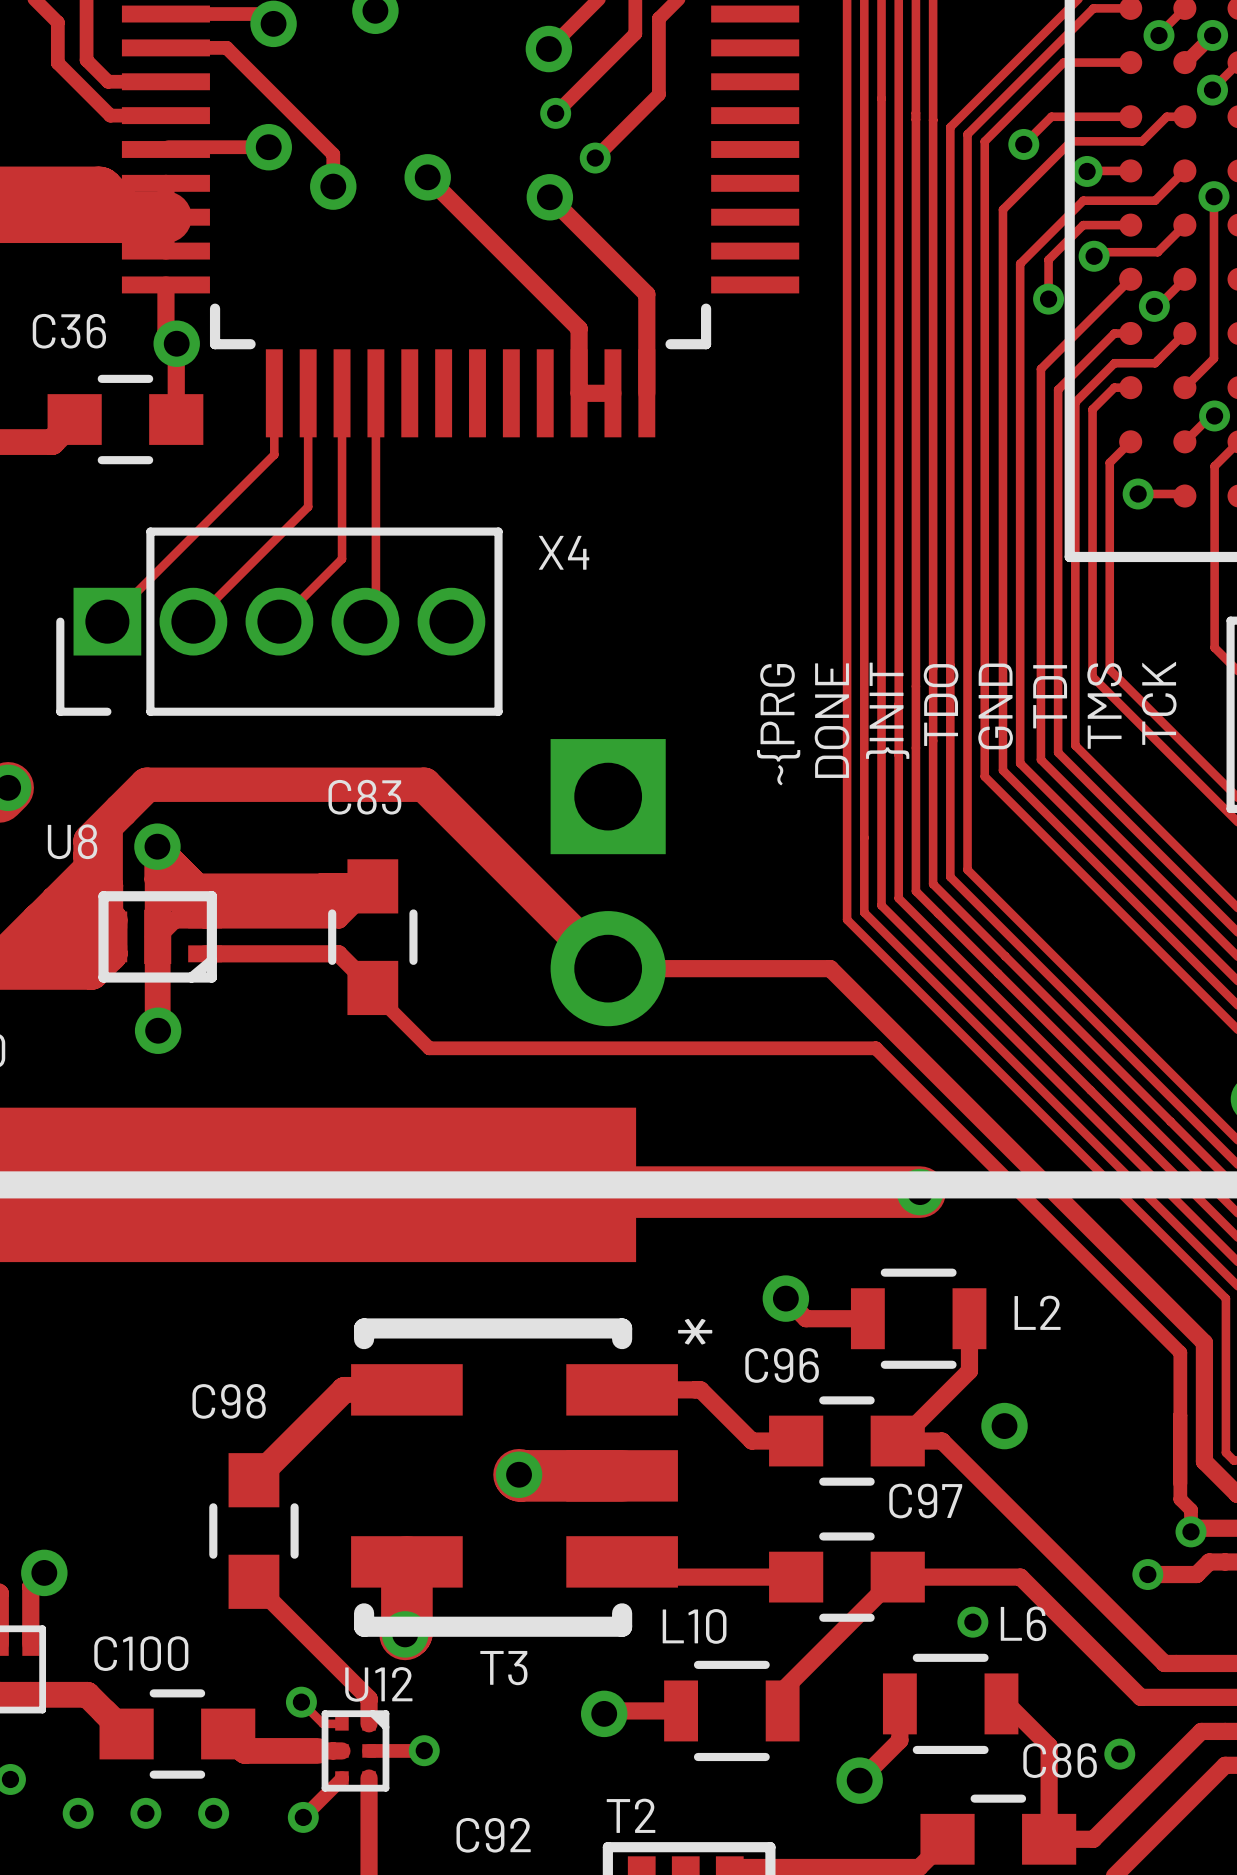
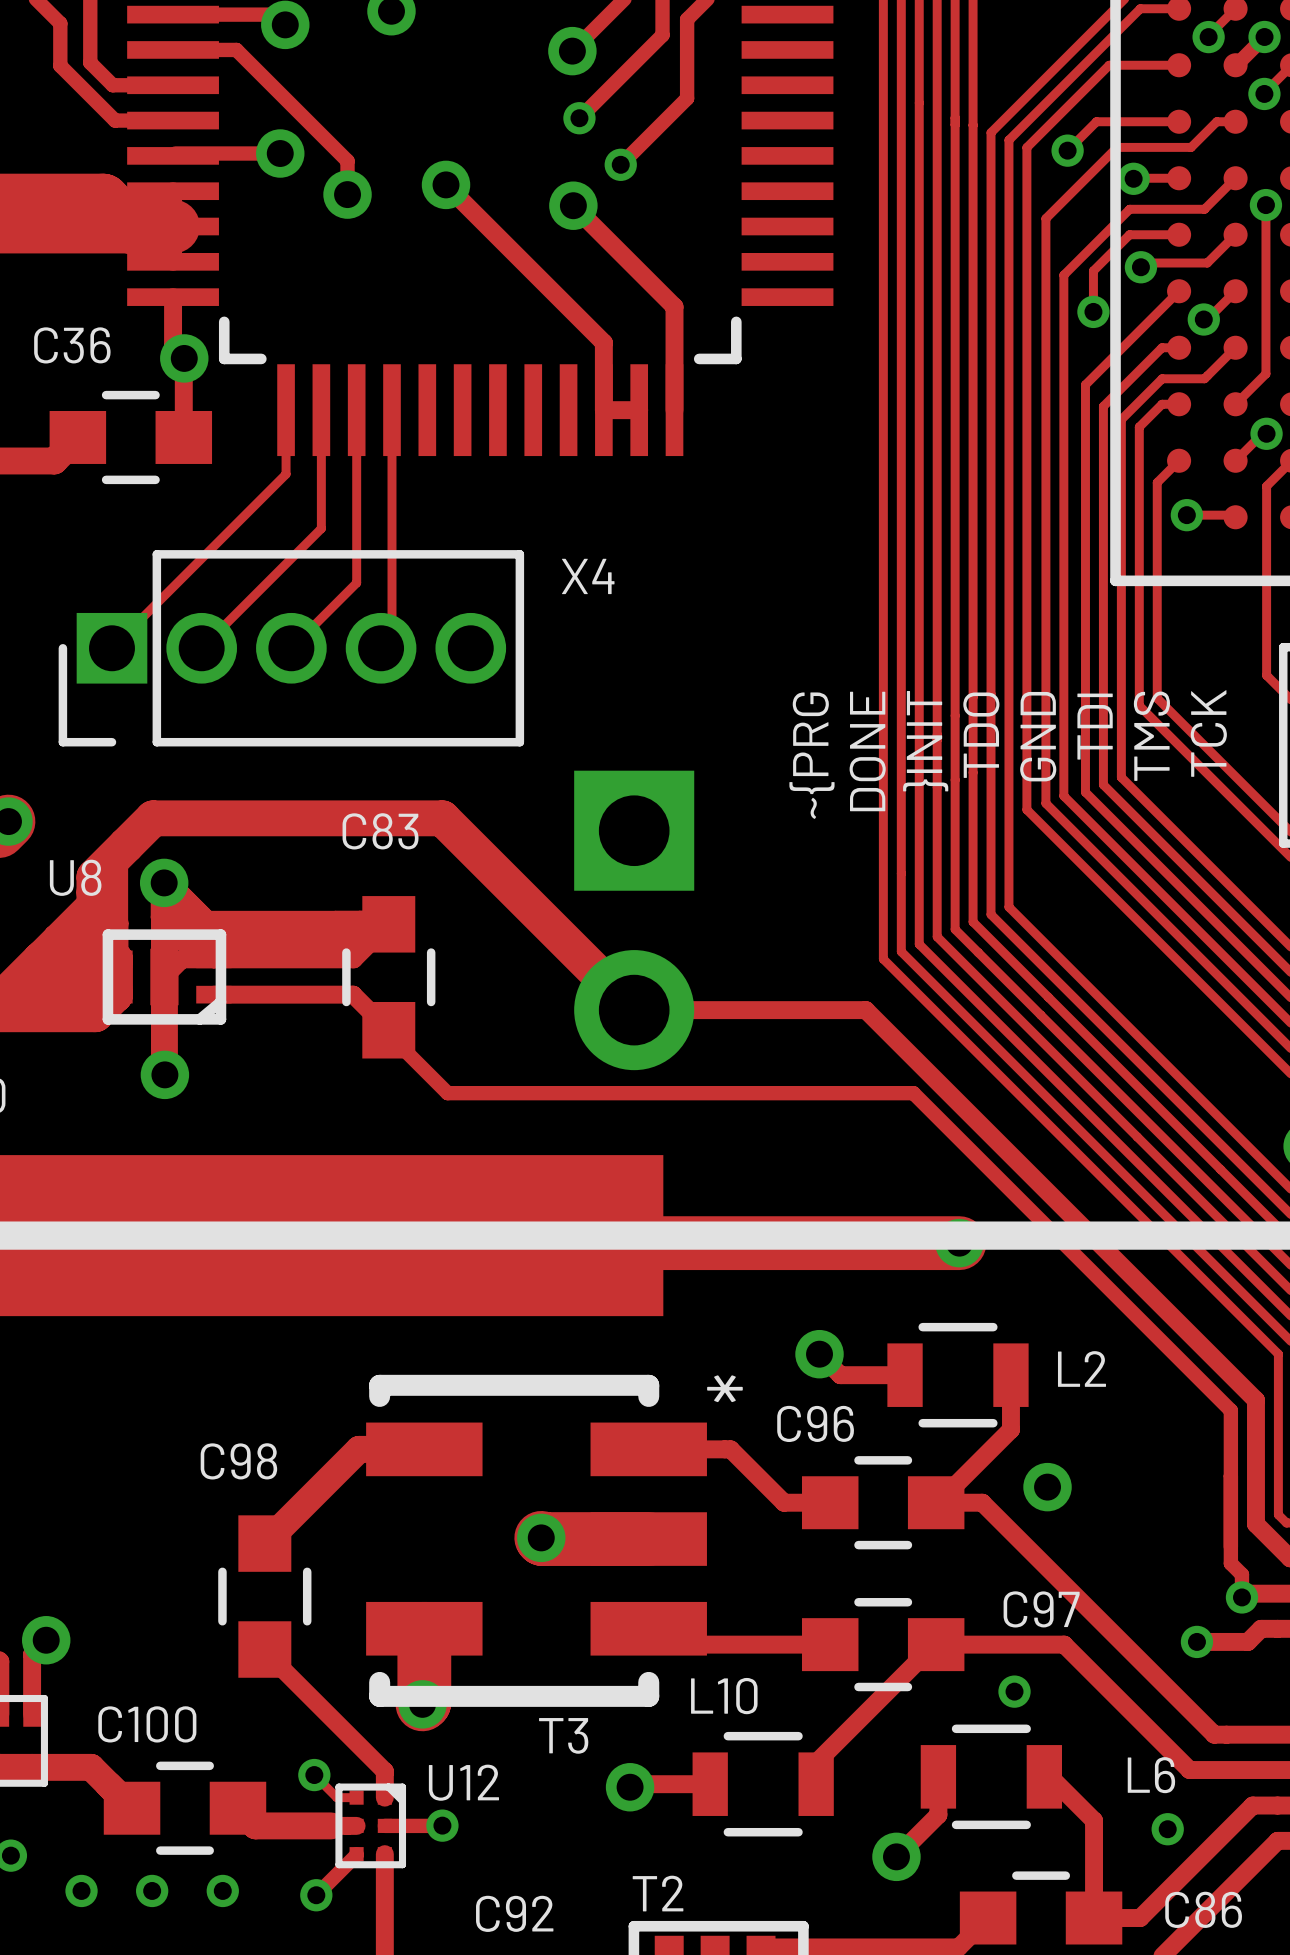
C97 name position: C97 (925, 1501) -> C97 (1041, 1609)
L6 name position: L6 (1023, 1623) -> L6 (1151, 1775)
T3 name position: T3 (503, 1668) -> T3 (563, 1735)
U12 name position: U12 (378, 1684) -> U12 (463, 1782)
C86 name position: C86 (1060, 1760) -> C86 (1203, 1909)

